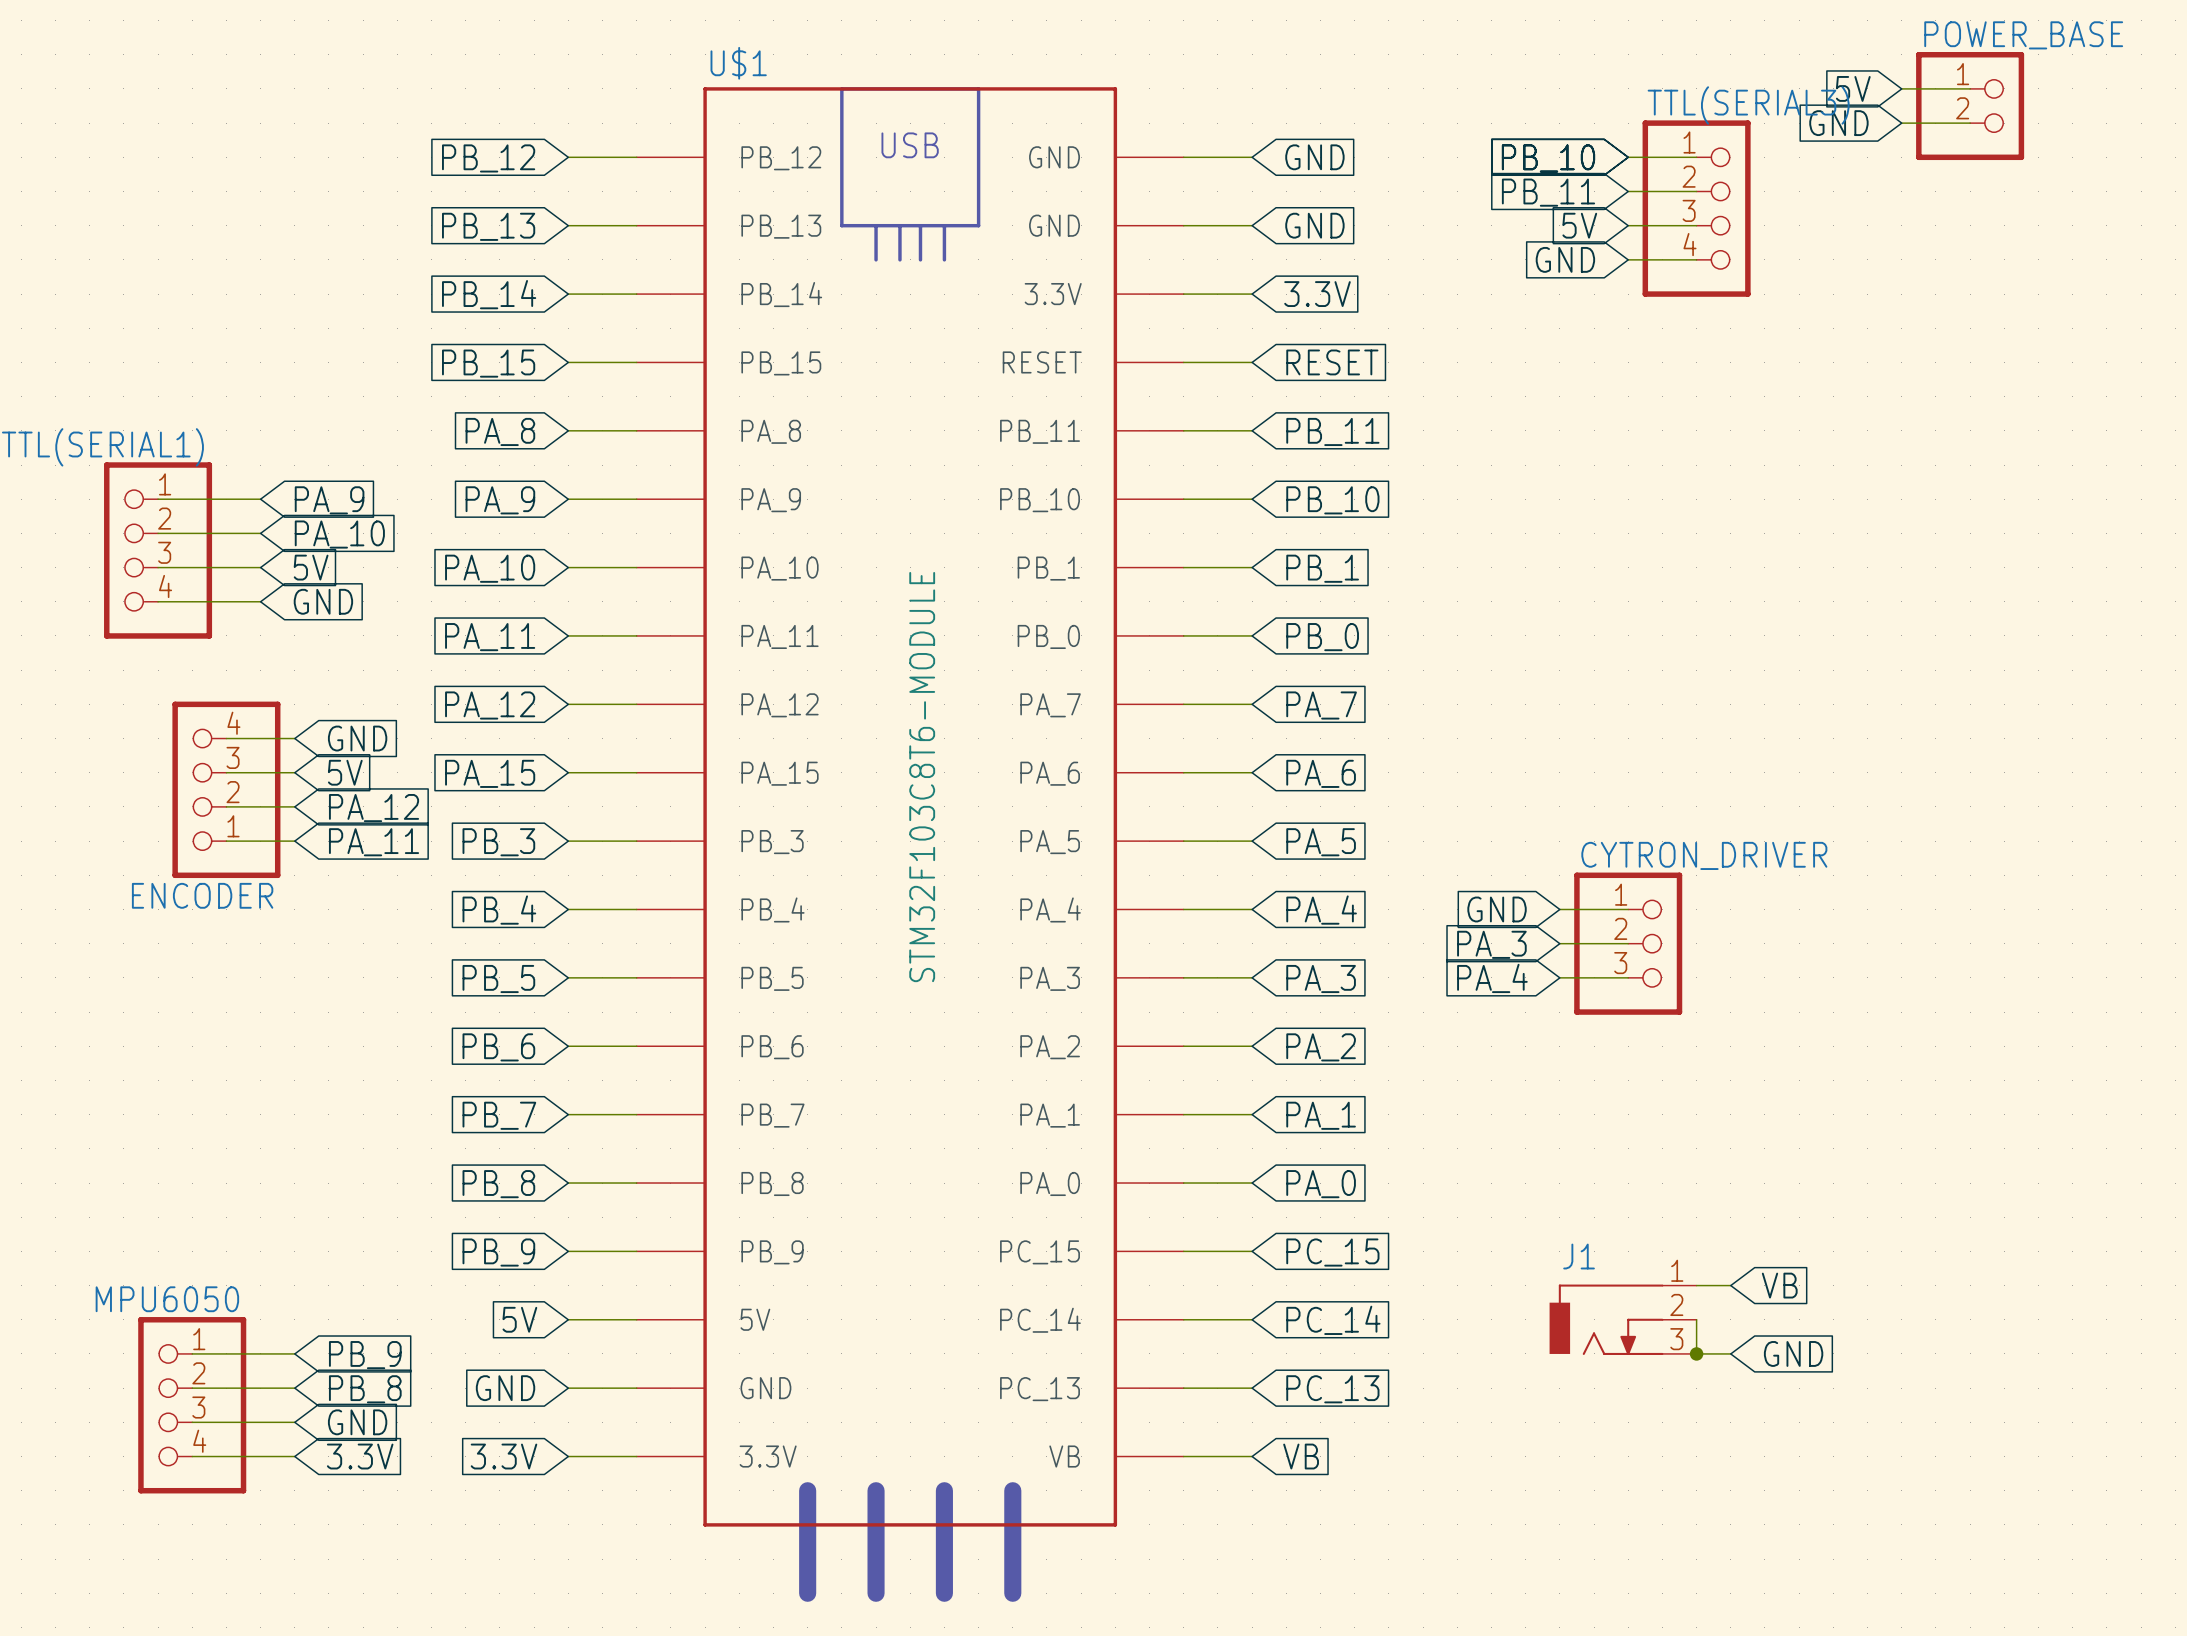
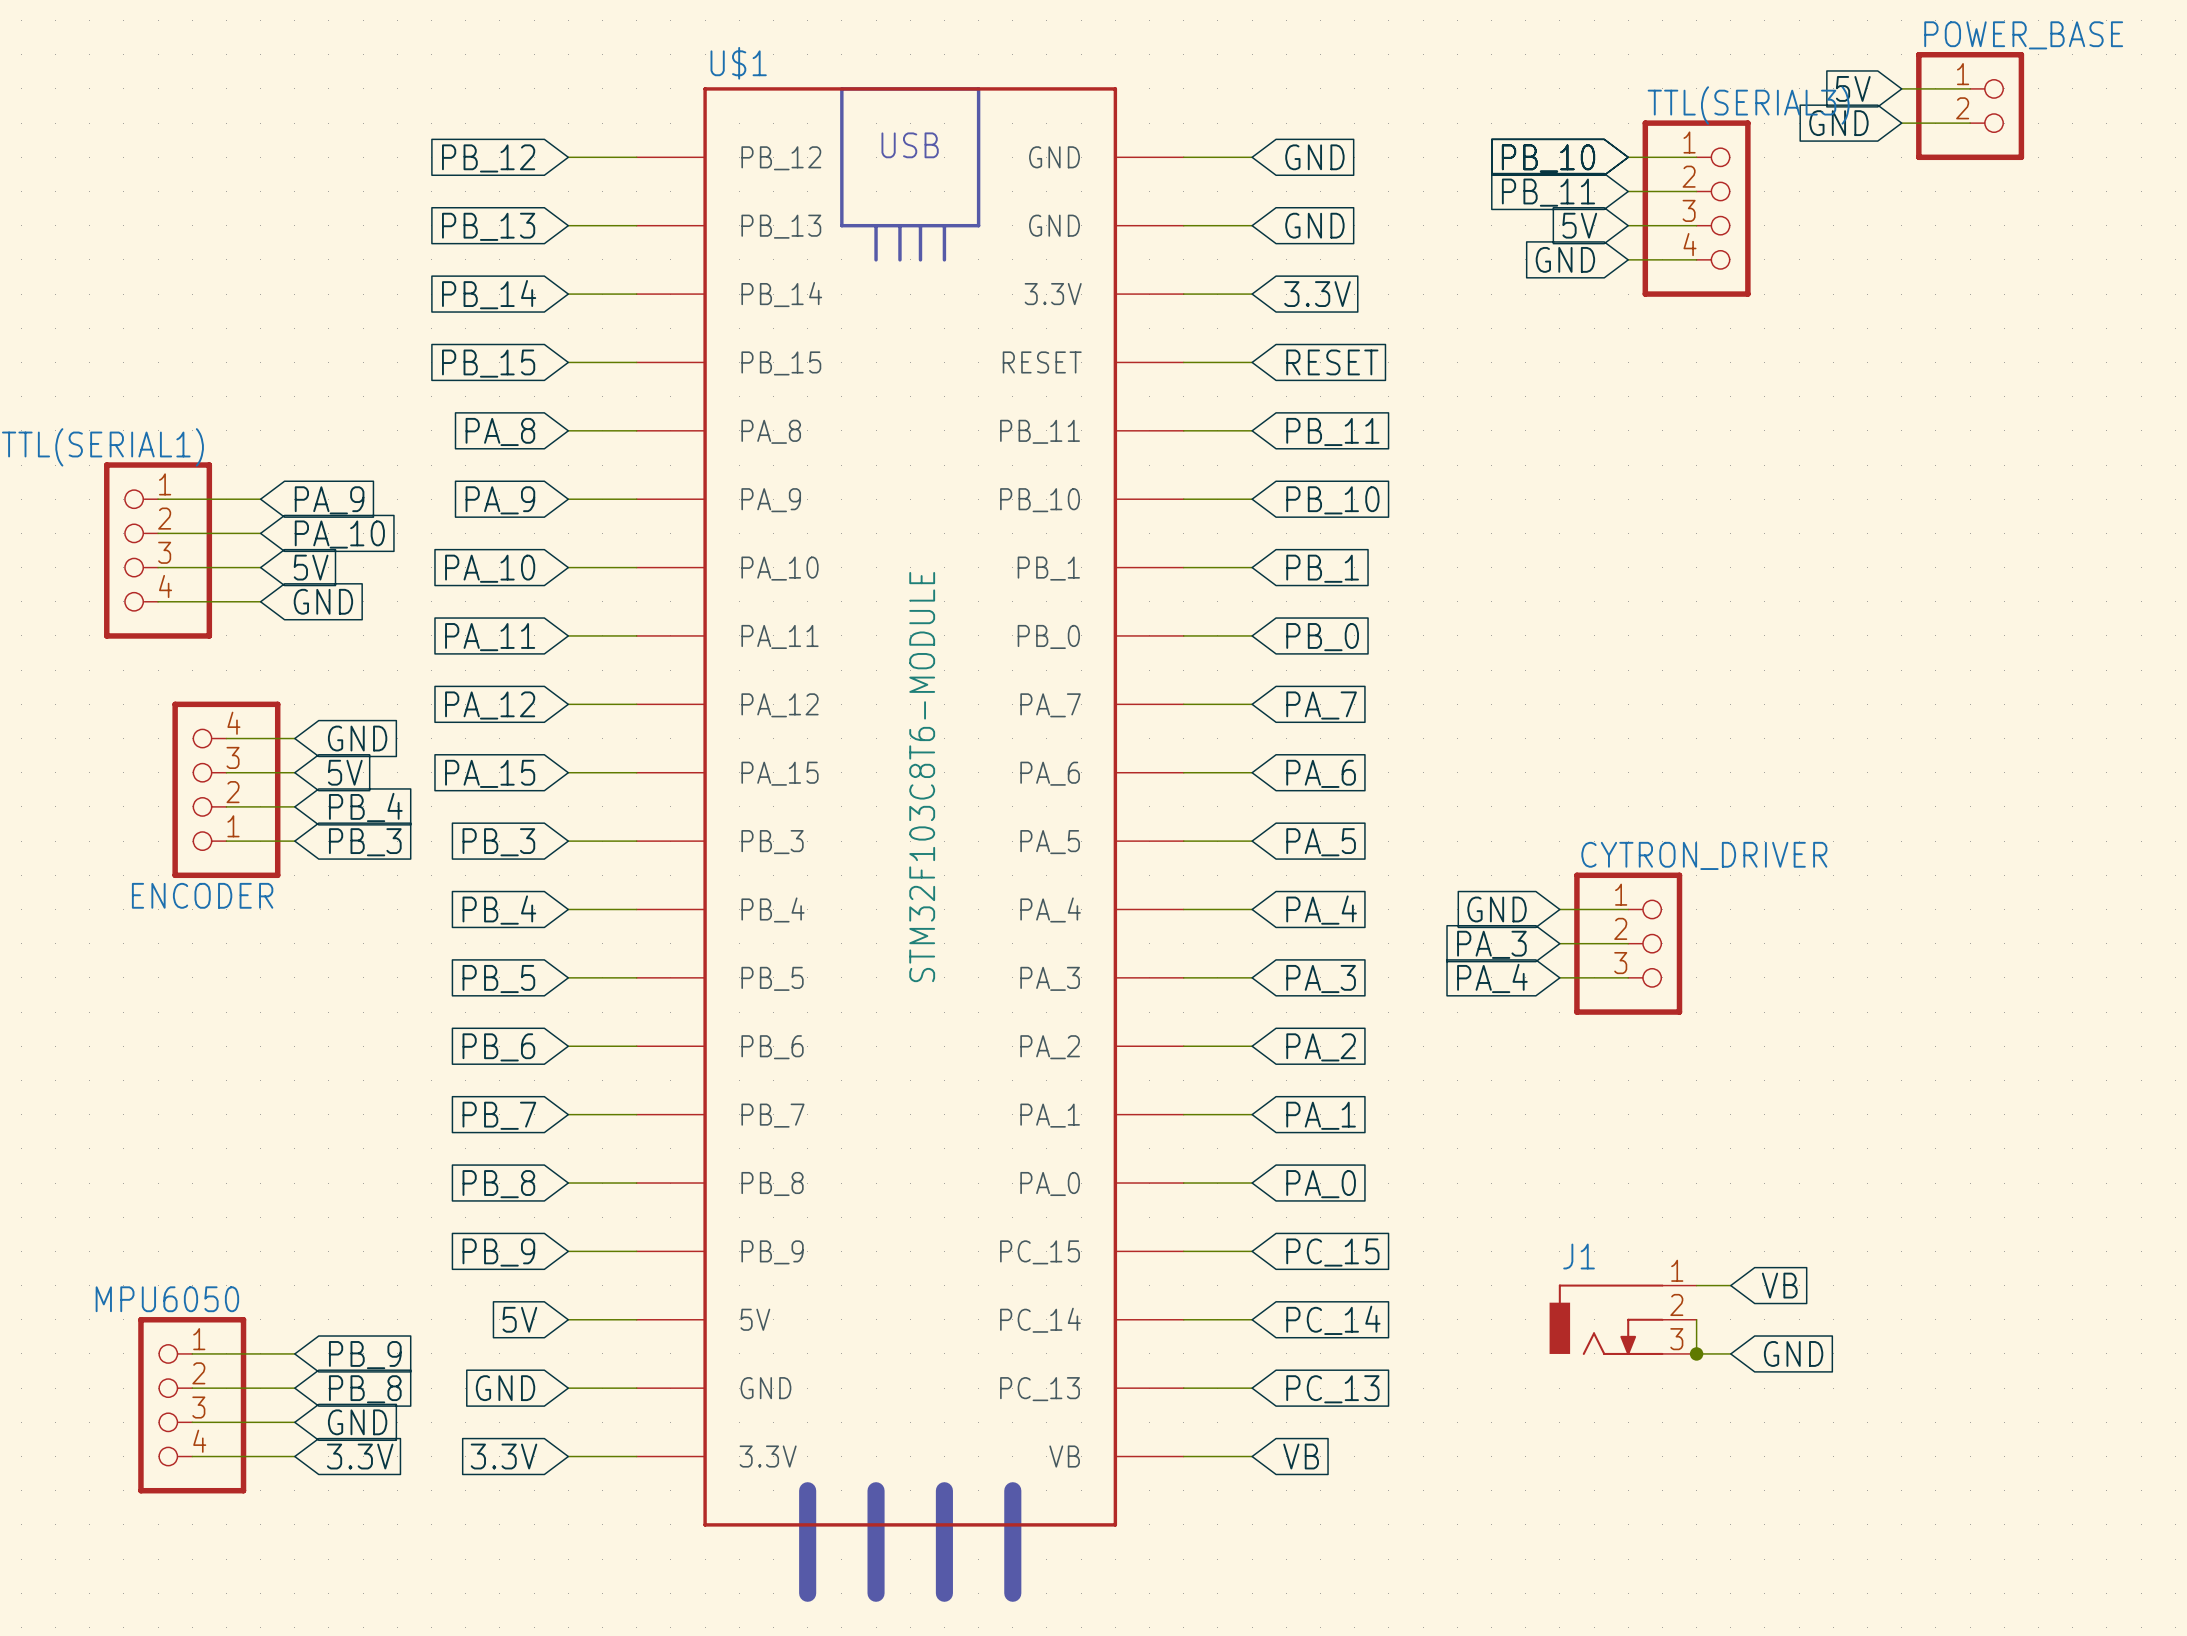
global label: PA_12 (374, 808) -> PB_4 (365, 807)
global label: PA_11 (374, 842) -> PB_3 (365, 842)

